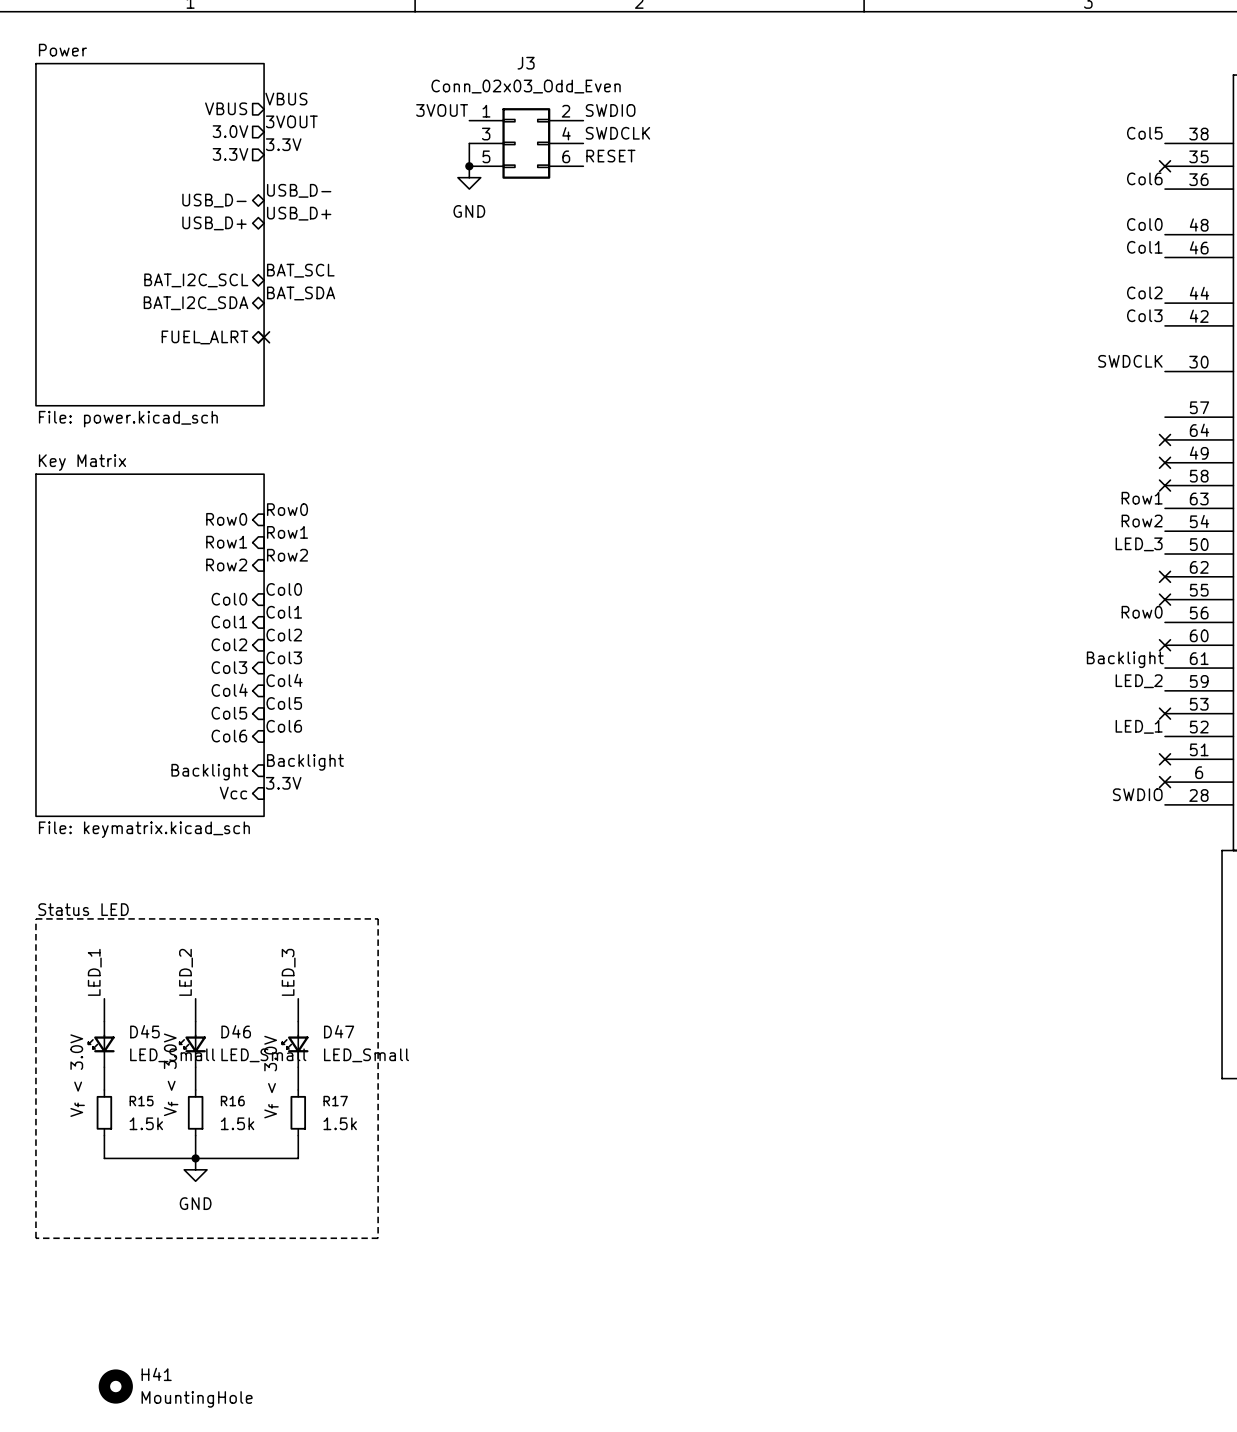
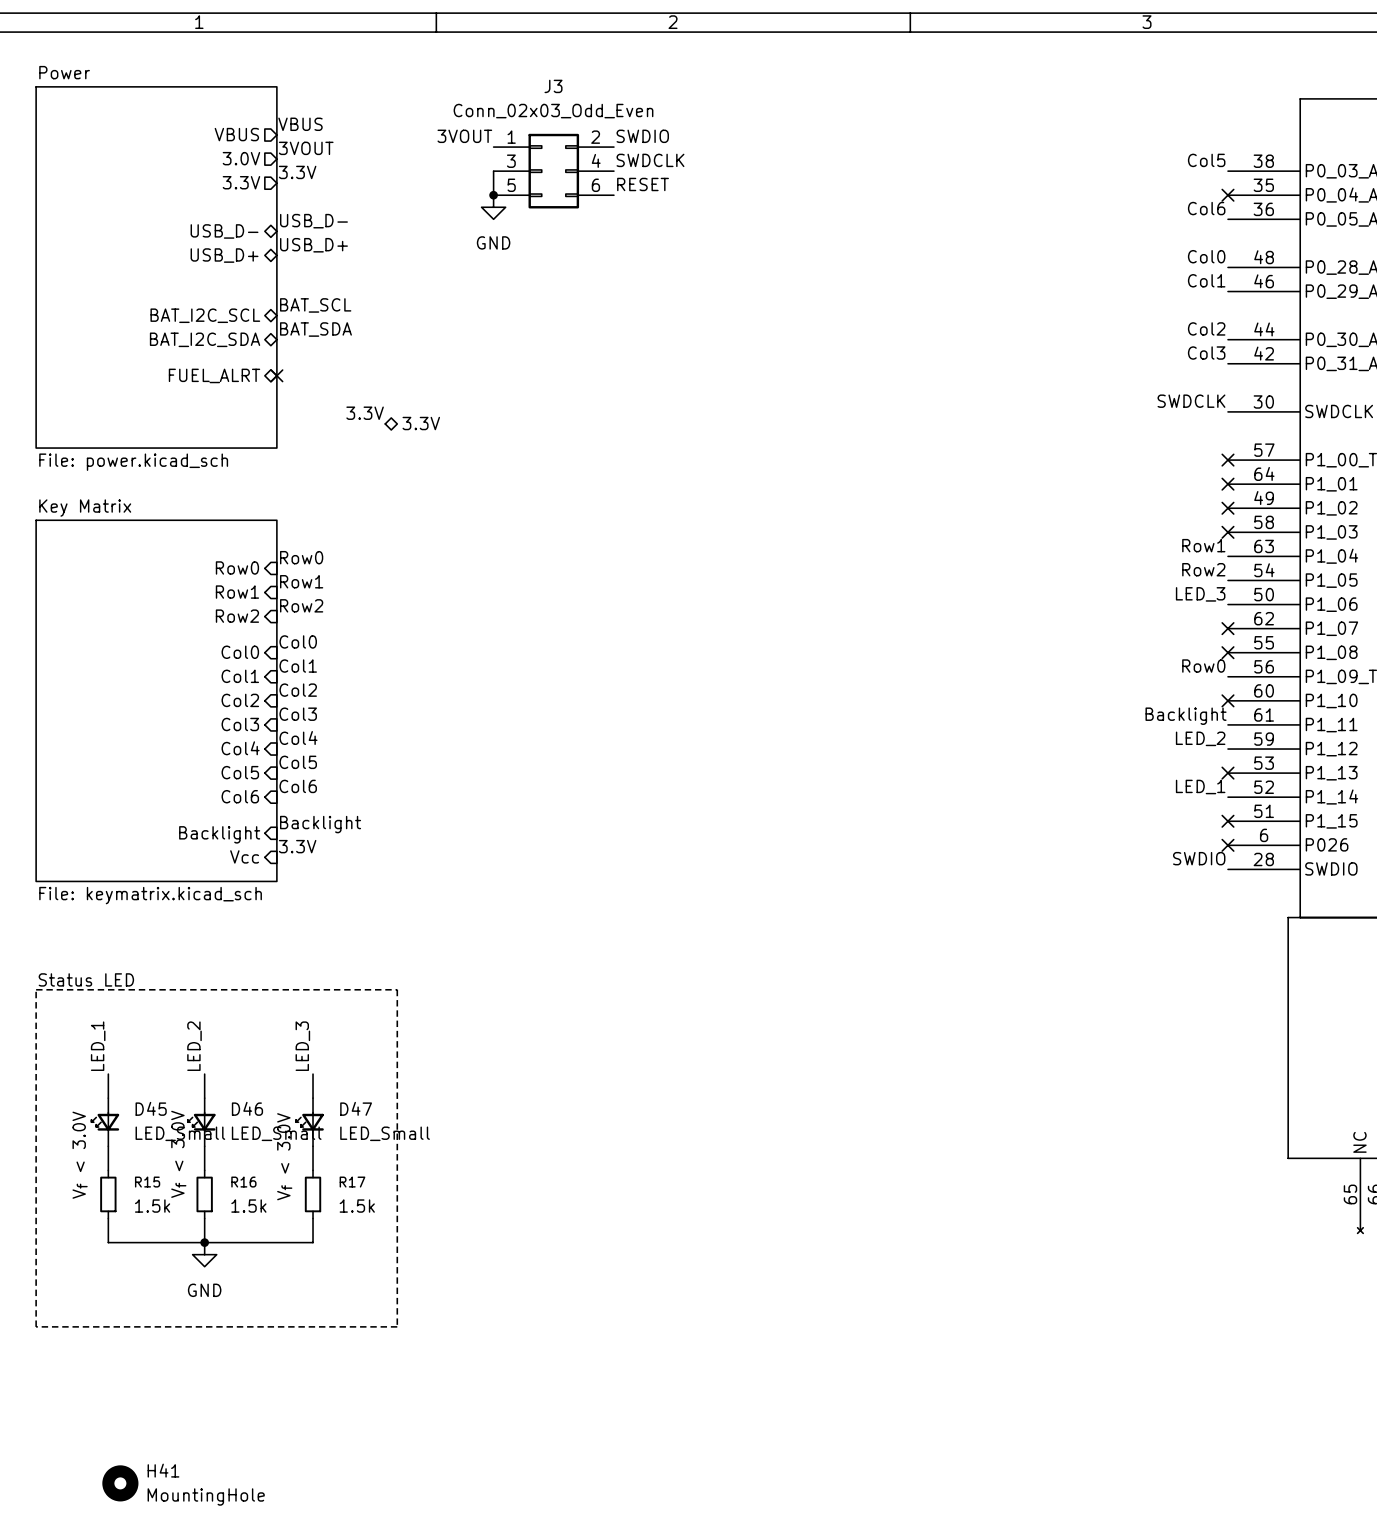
label: none -> 3.3V (365, 413)
hierarchical label: none -> 3.3V (421, 423)
no-connect mark: none -> (1227, 460)

